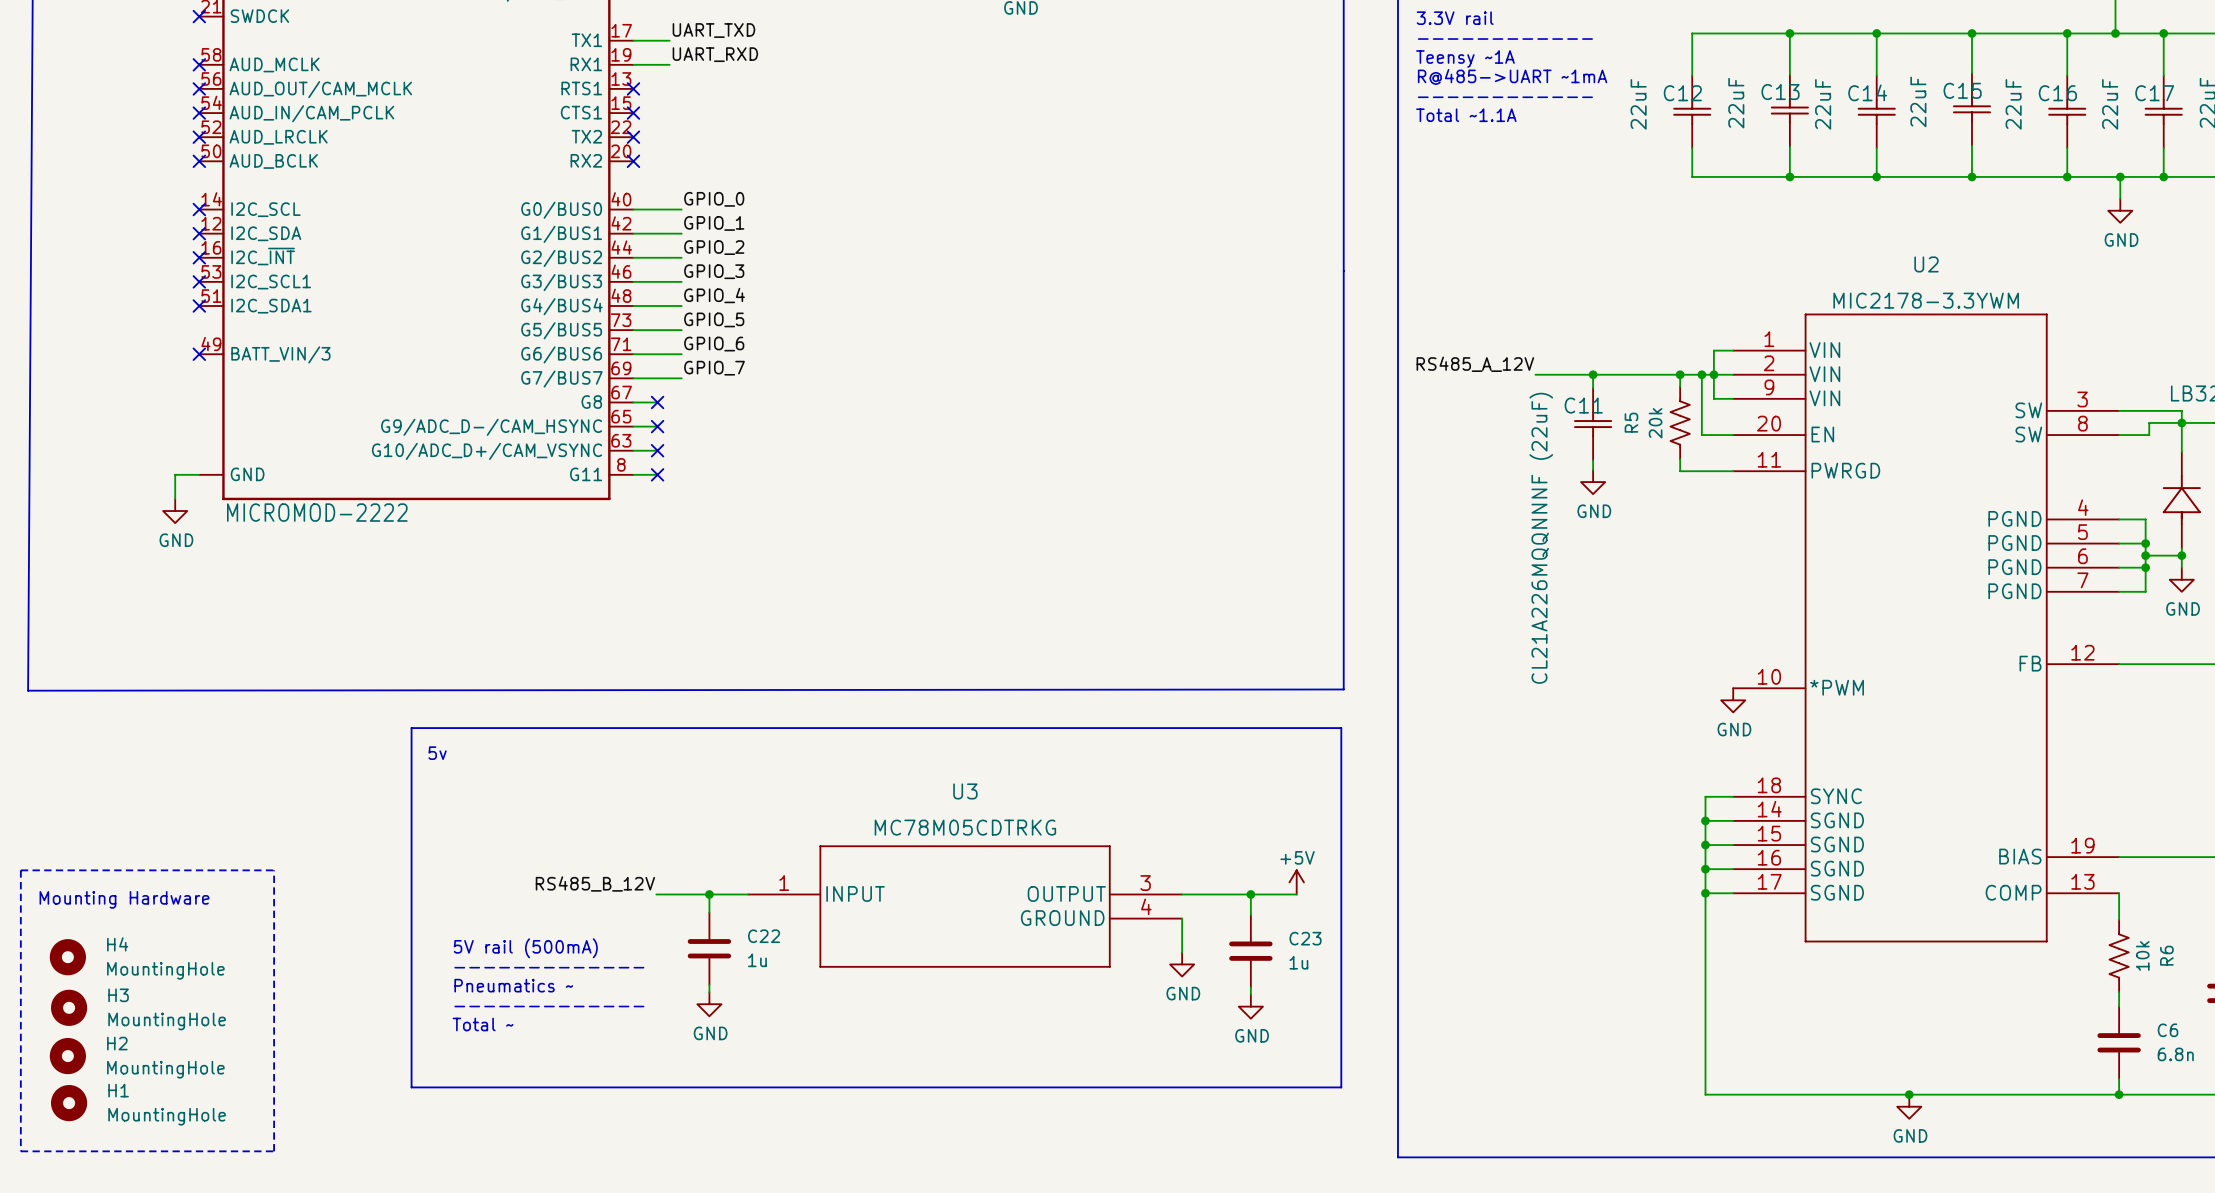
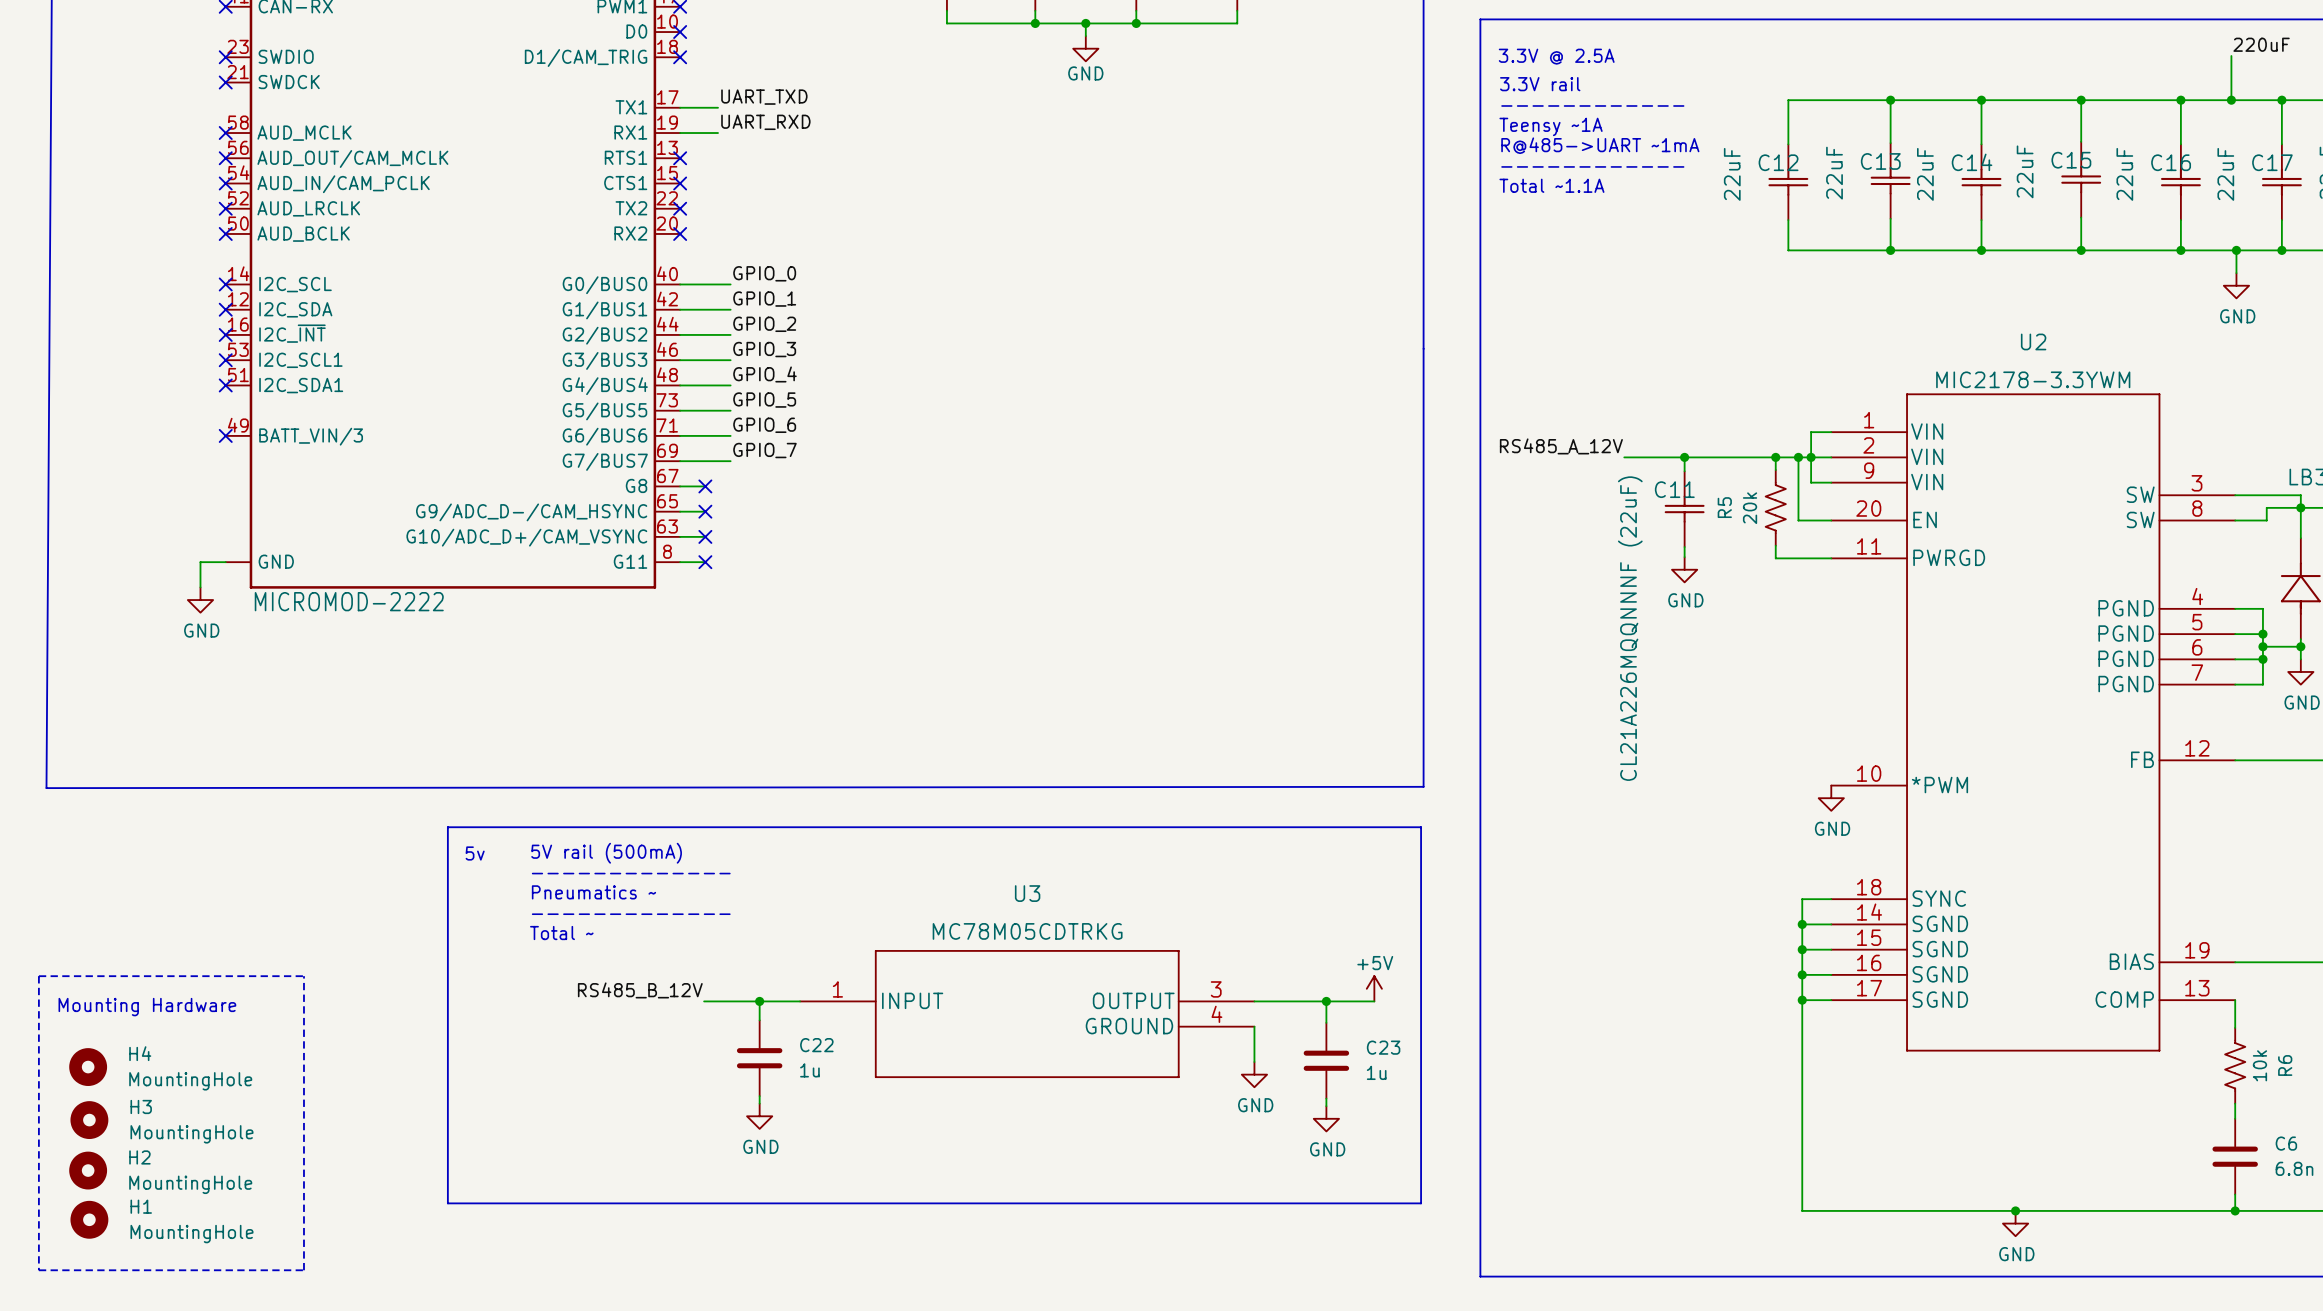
text: none -> ------------- (631, 873)
text: none -> ------------- (631, 914)
text position: 5V rail (500mA) (525, 948) -> 5V rail (500mA) (606, 853)
text: ------------- (549, 967) -> none
text position: Pneumatics ~ (513, 985) -> Pneumatics ~ (593, 892)
text: ------------- (549, 1006) -> none
text position: Total ~ (483, 1024) -> Total ~ (561, 933)

